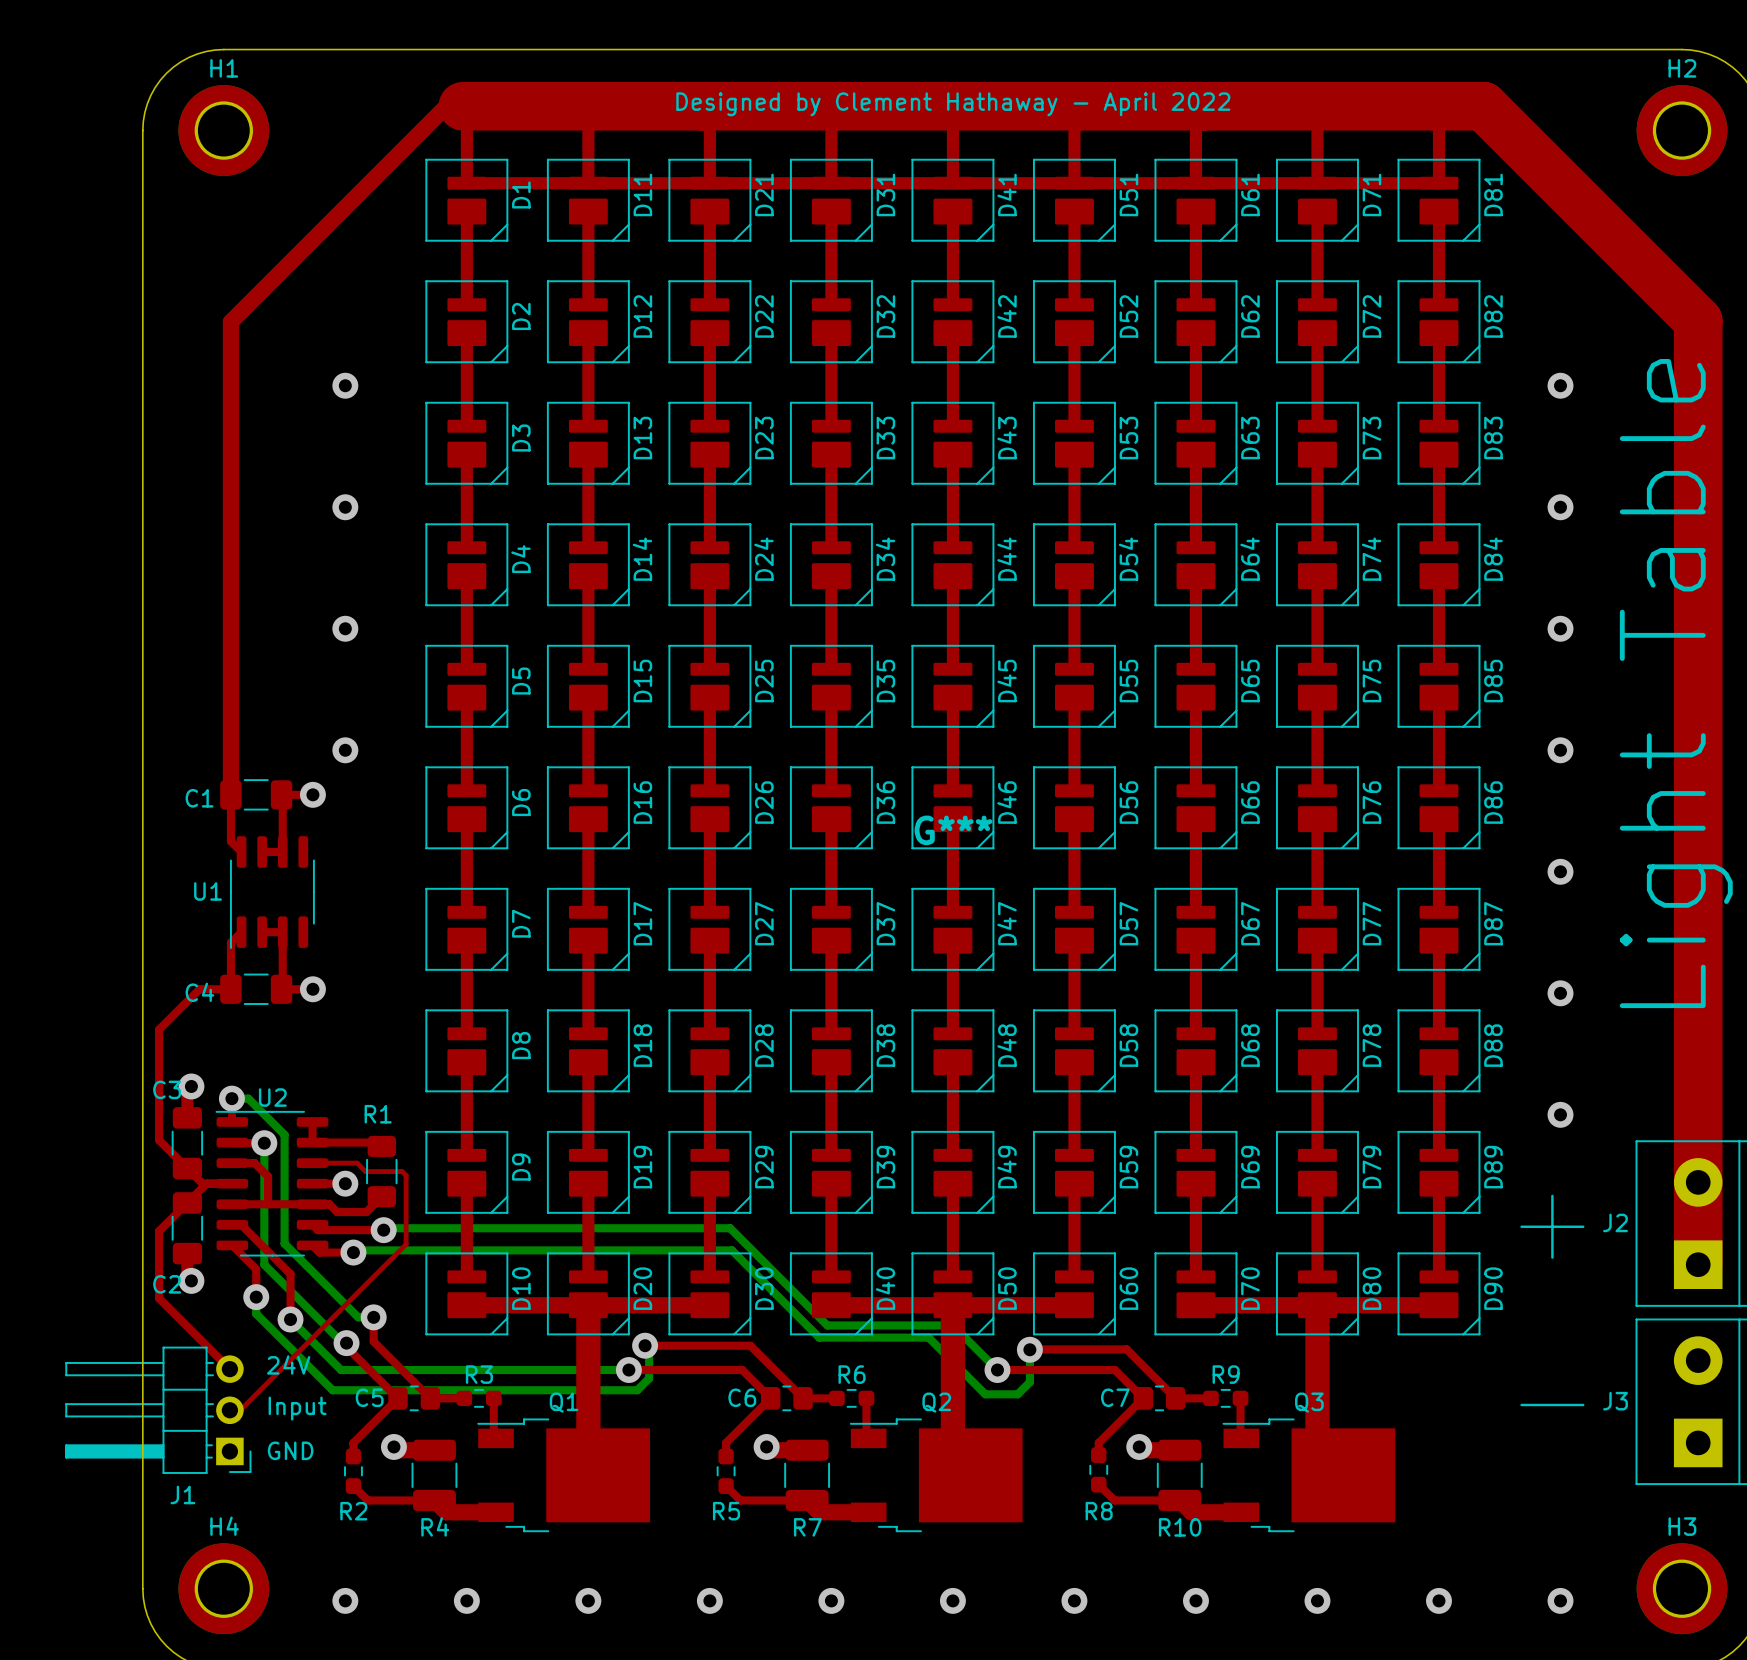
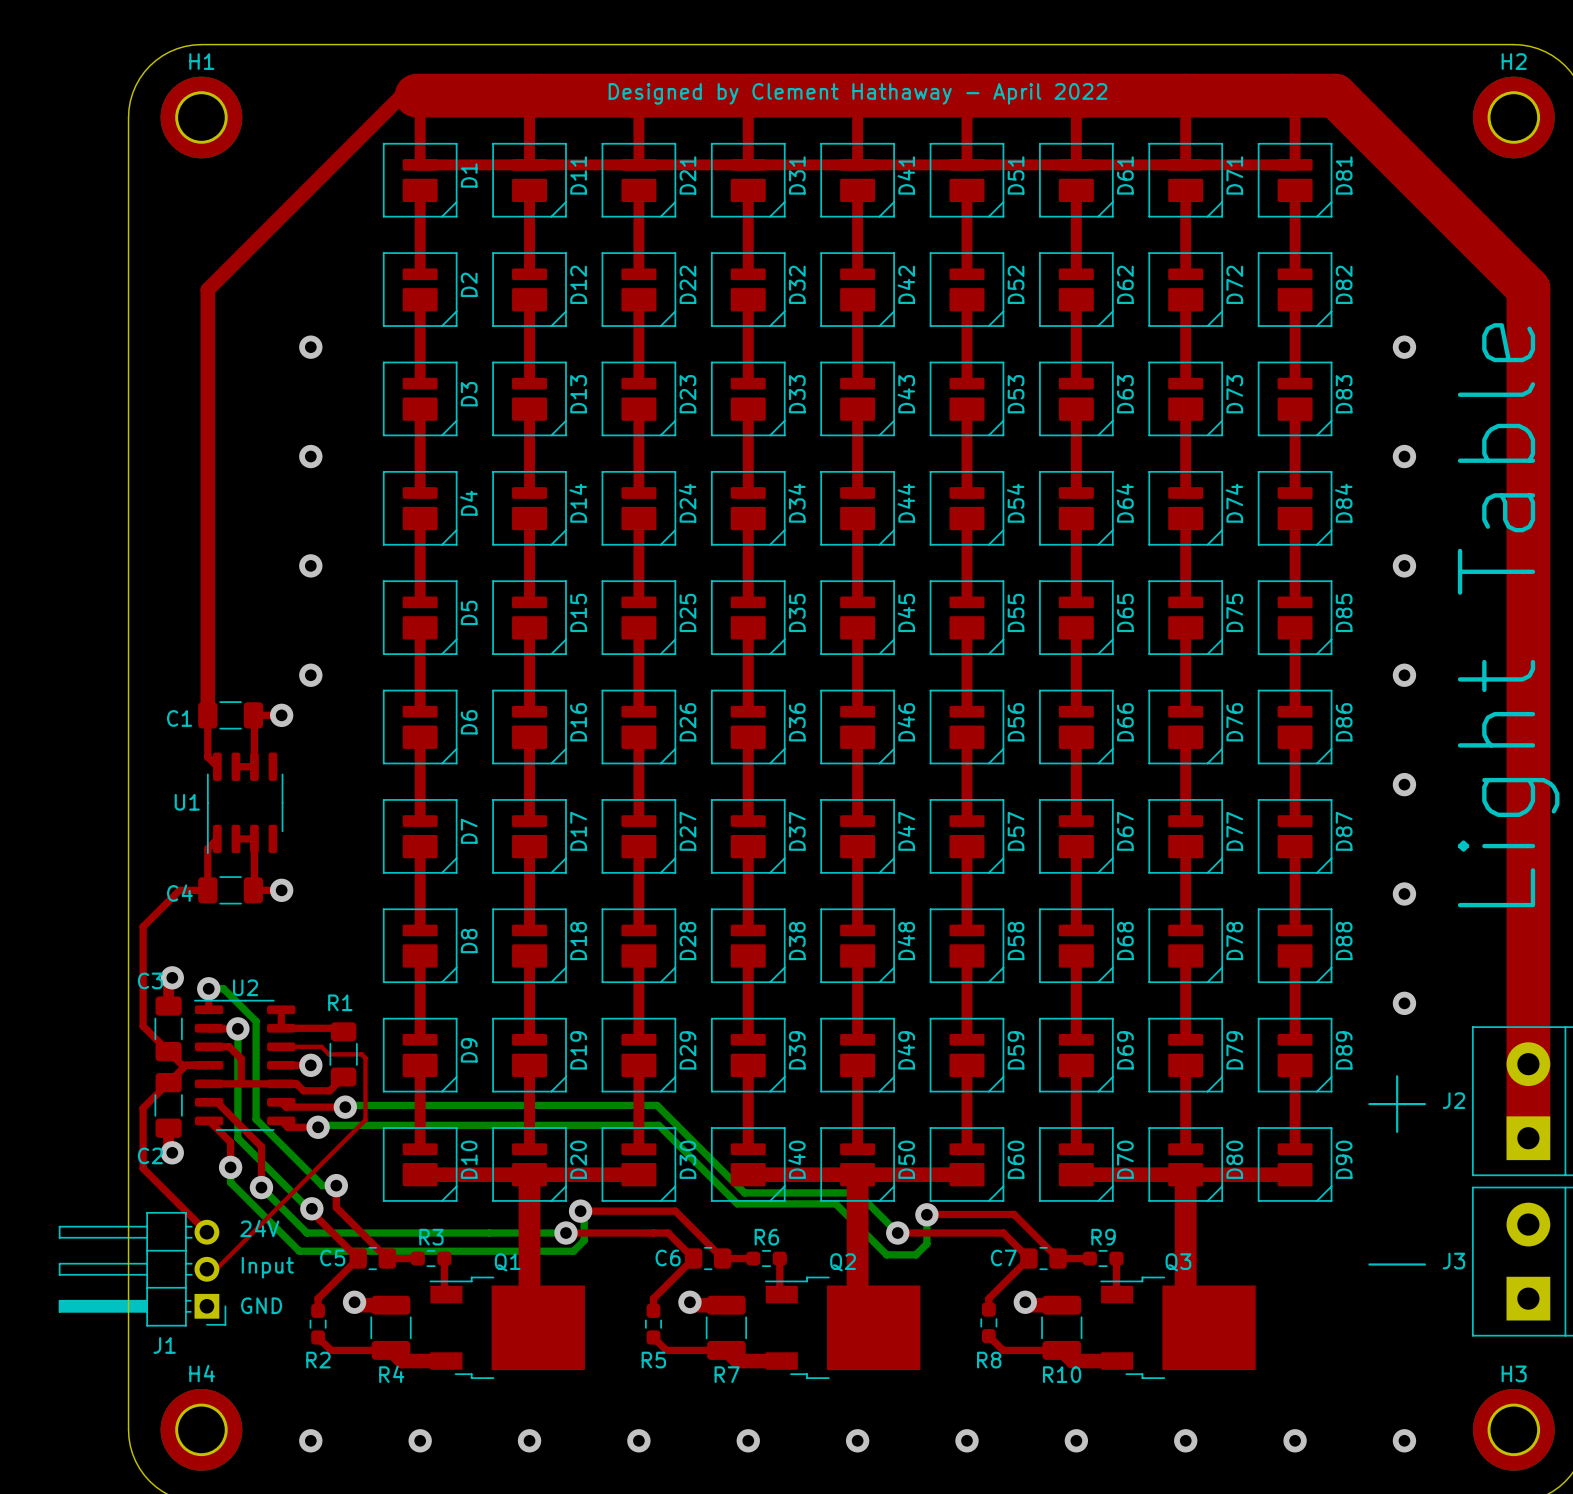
G***: (953, 830) -> none

